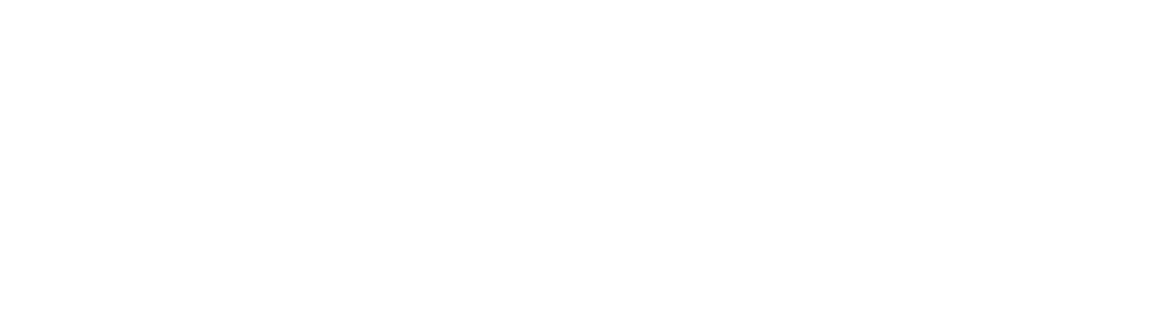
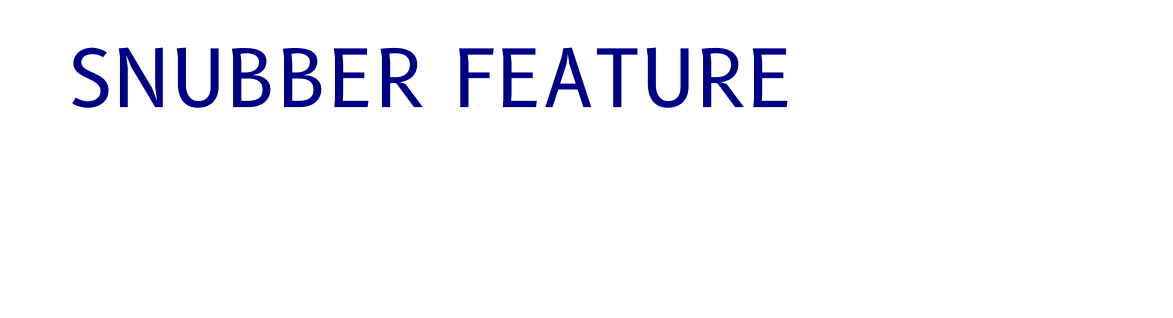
text: none -> SNUBBER FEATURE (429, 77)

